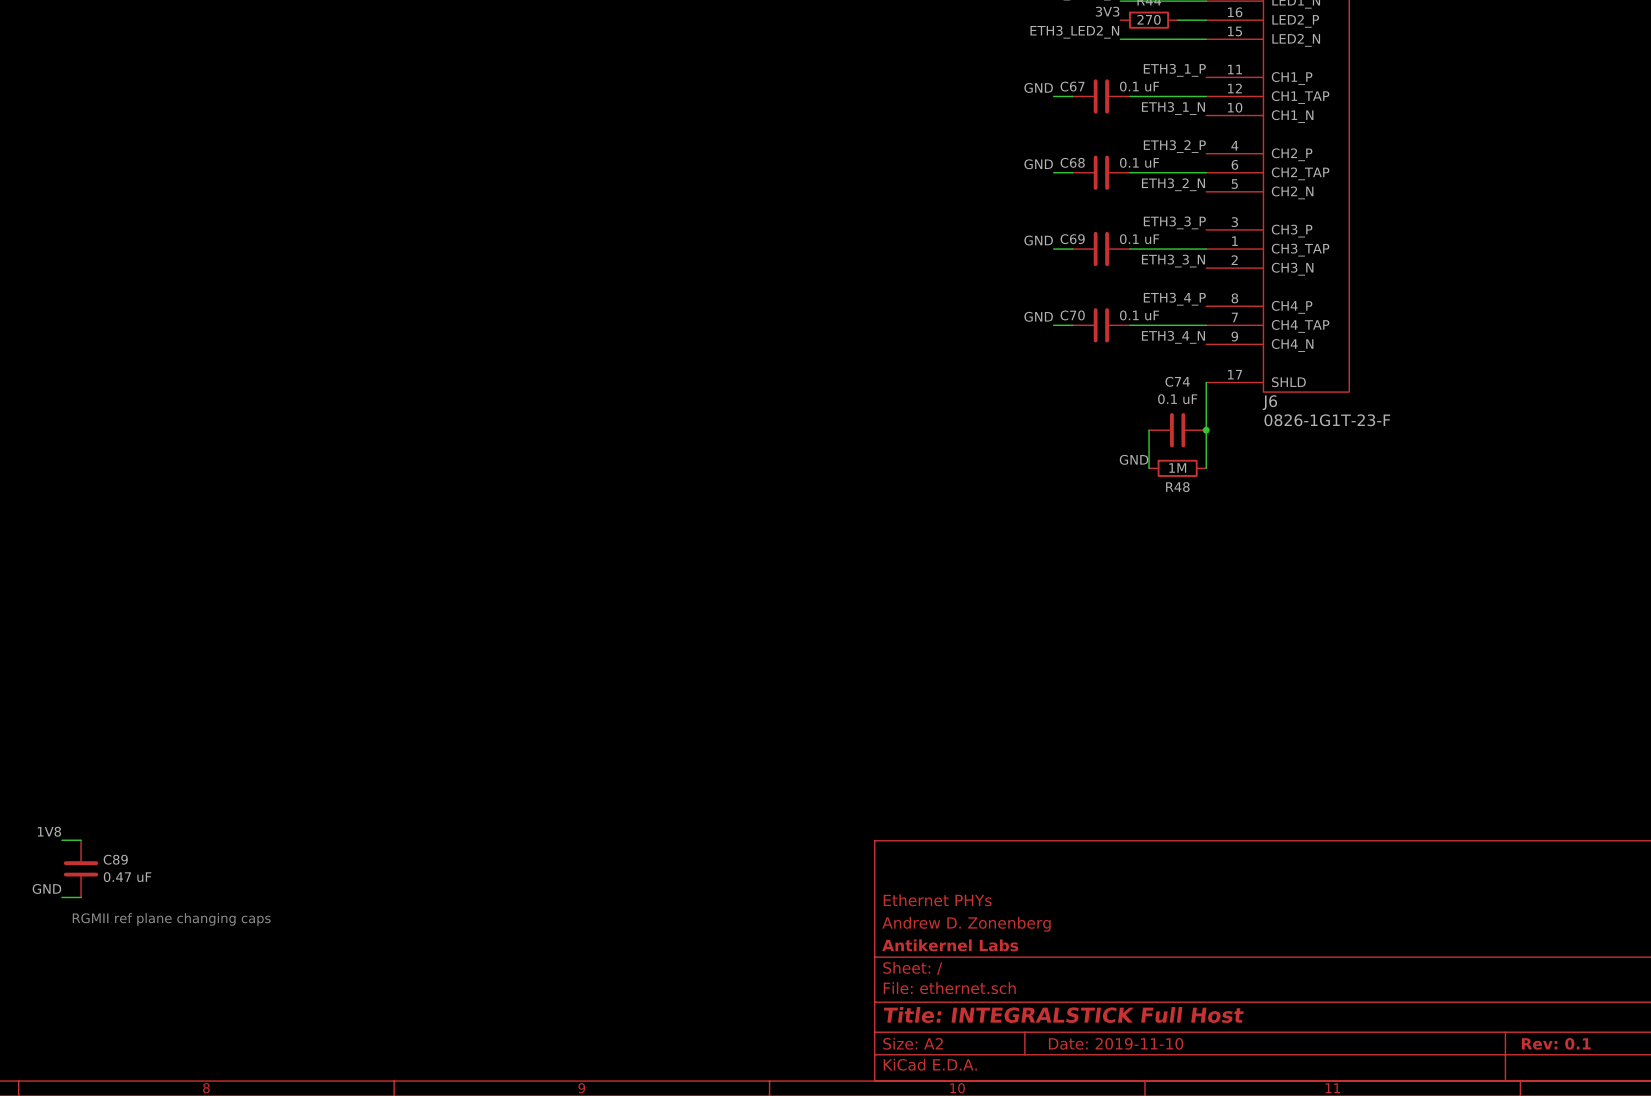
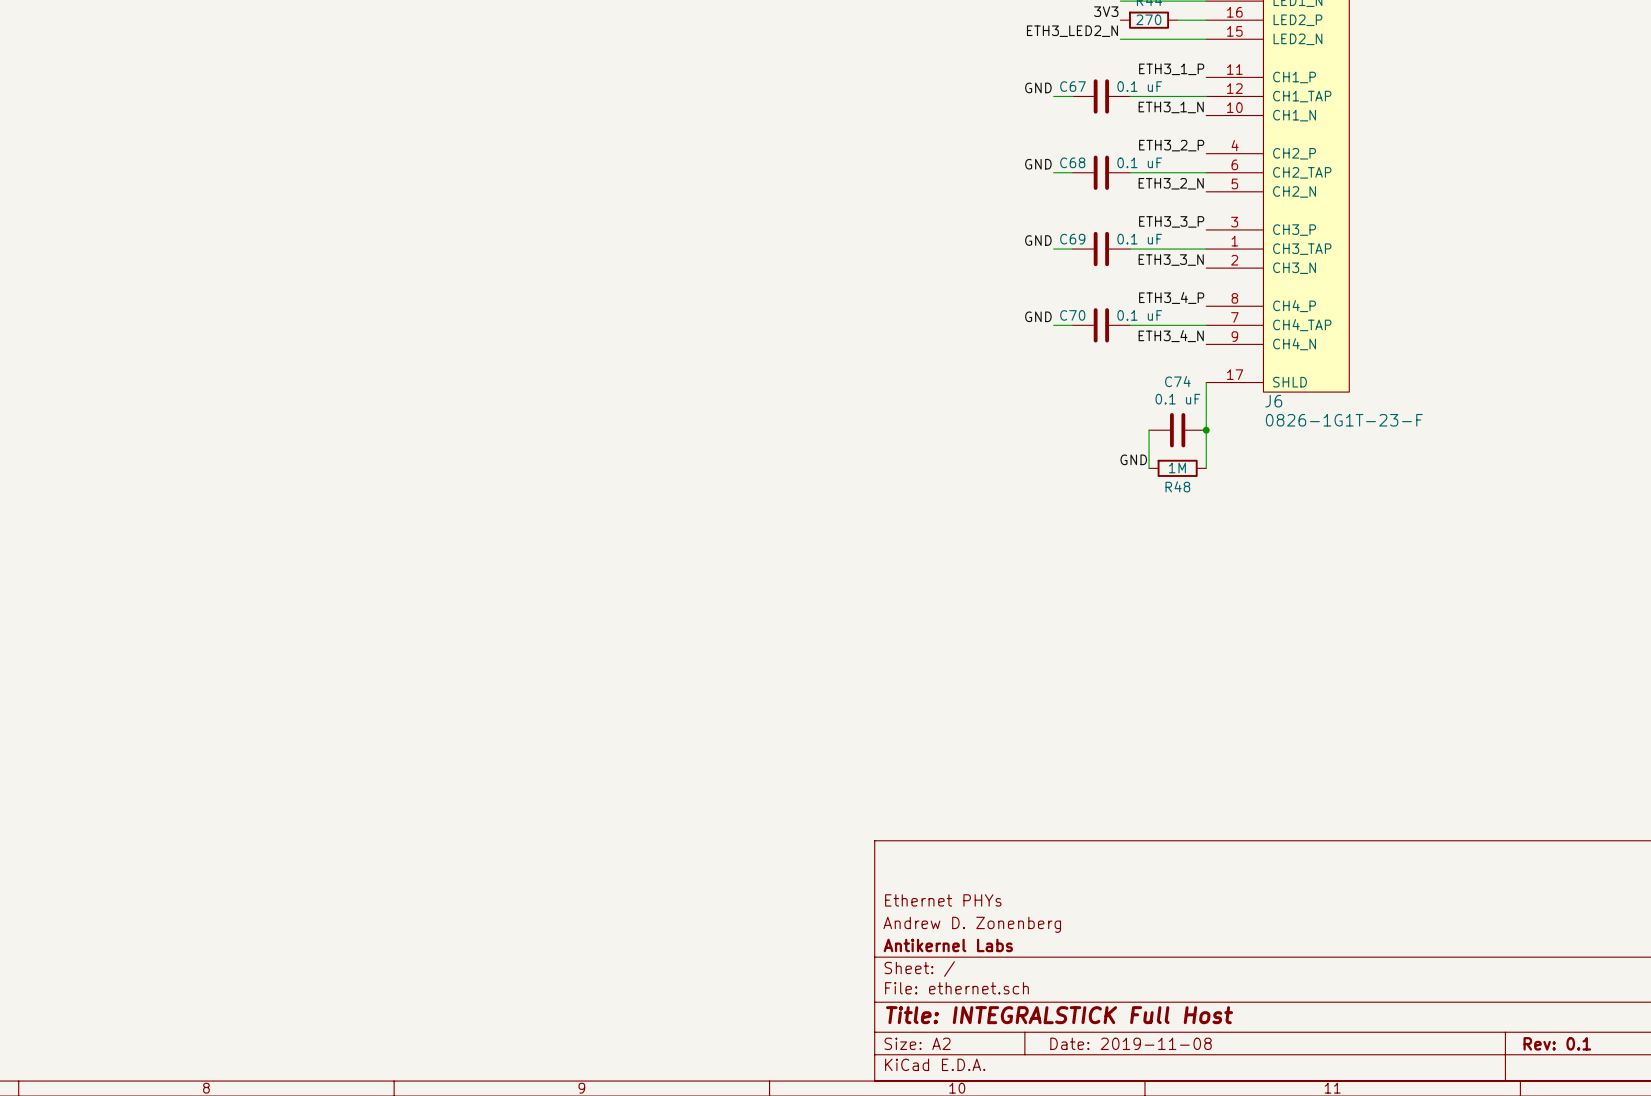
label: 1V8 (49, 831) -> none
wire: (61, 840) (81, 840) -> none
C89: 0.47 uF (81, 868) -> none
label: GND (46, 888) -> none
wire: (61, 897) (81, 897) -> none
text: RGMII ref plane changing caps (171, 919) -> none
title block: Date: 2019-11-10 (1116, 1043) -> Date: 2019-11-08 (1131, 1043)

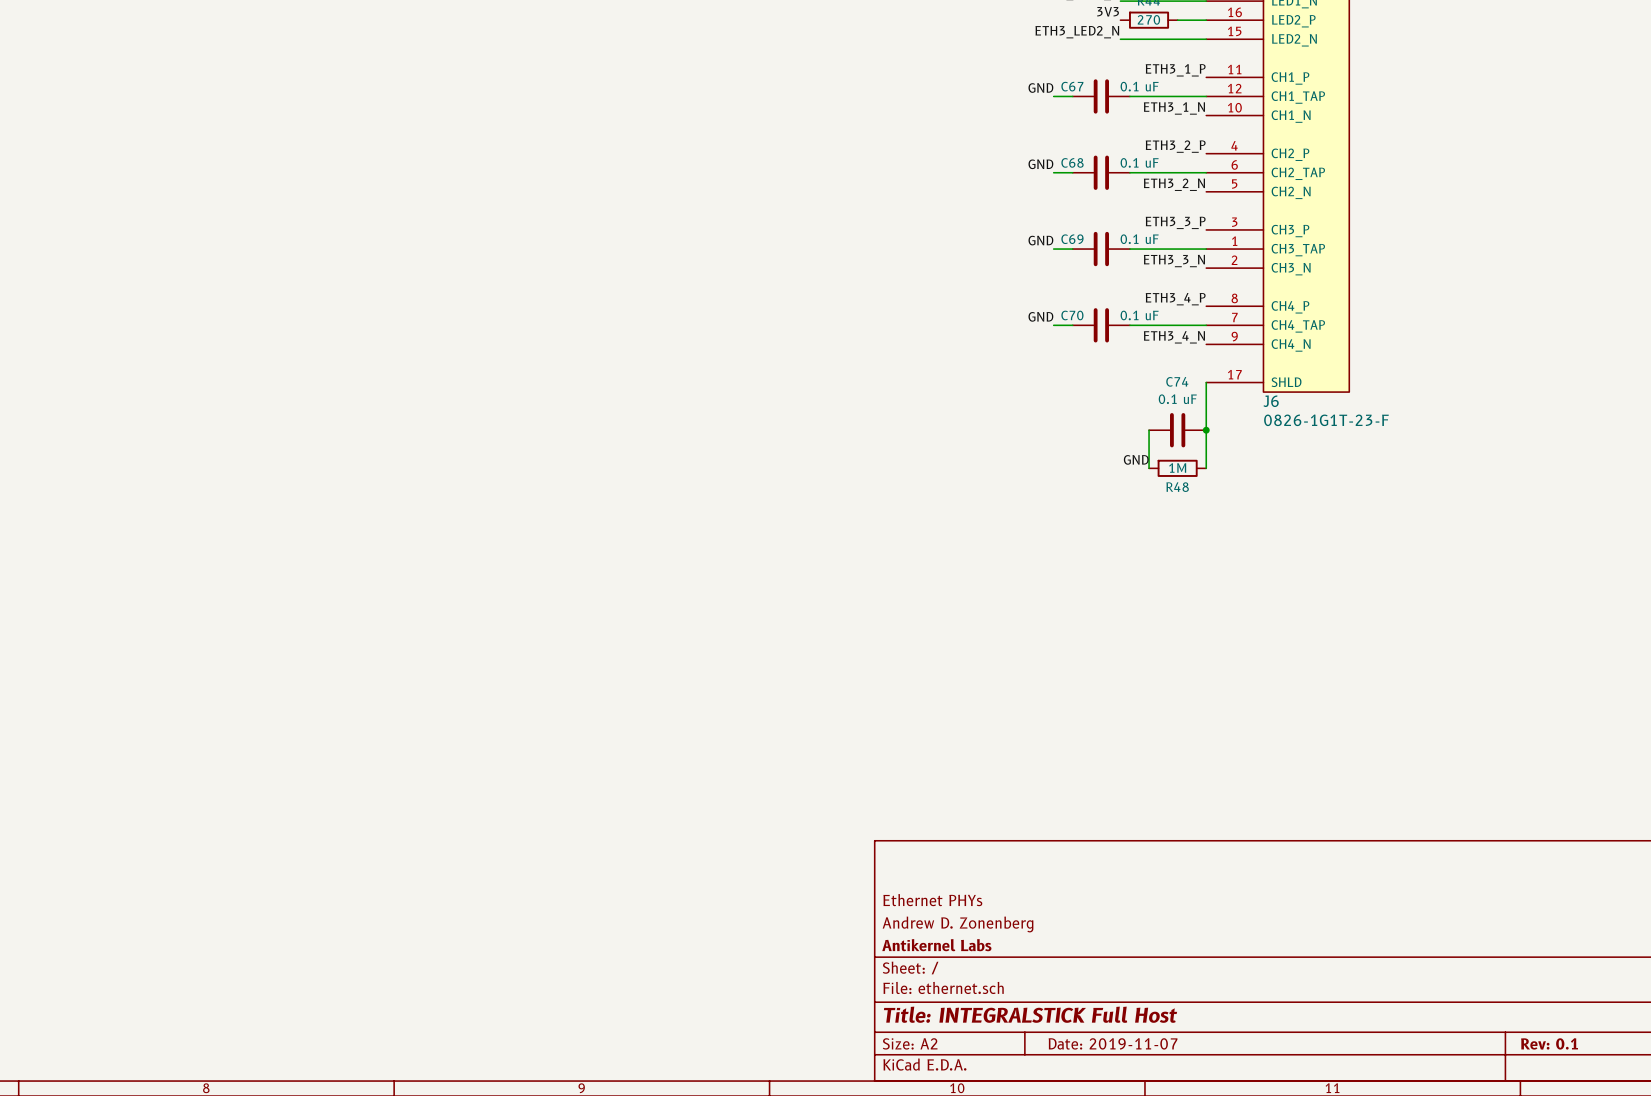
title block: Date: 2019-11-08 (1131, 1043) -> Date: 2019-11-07 (1113, 1043)

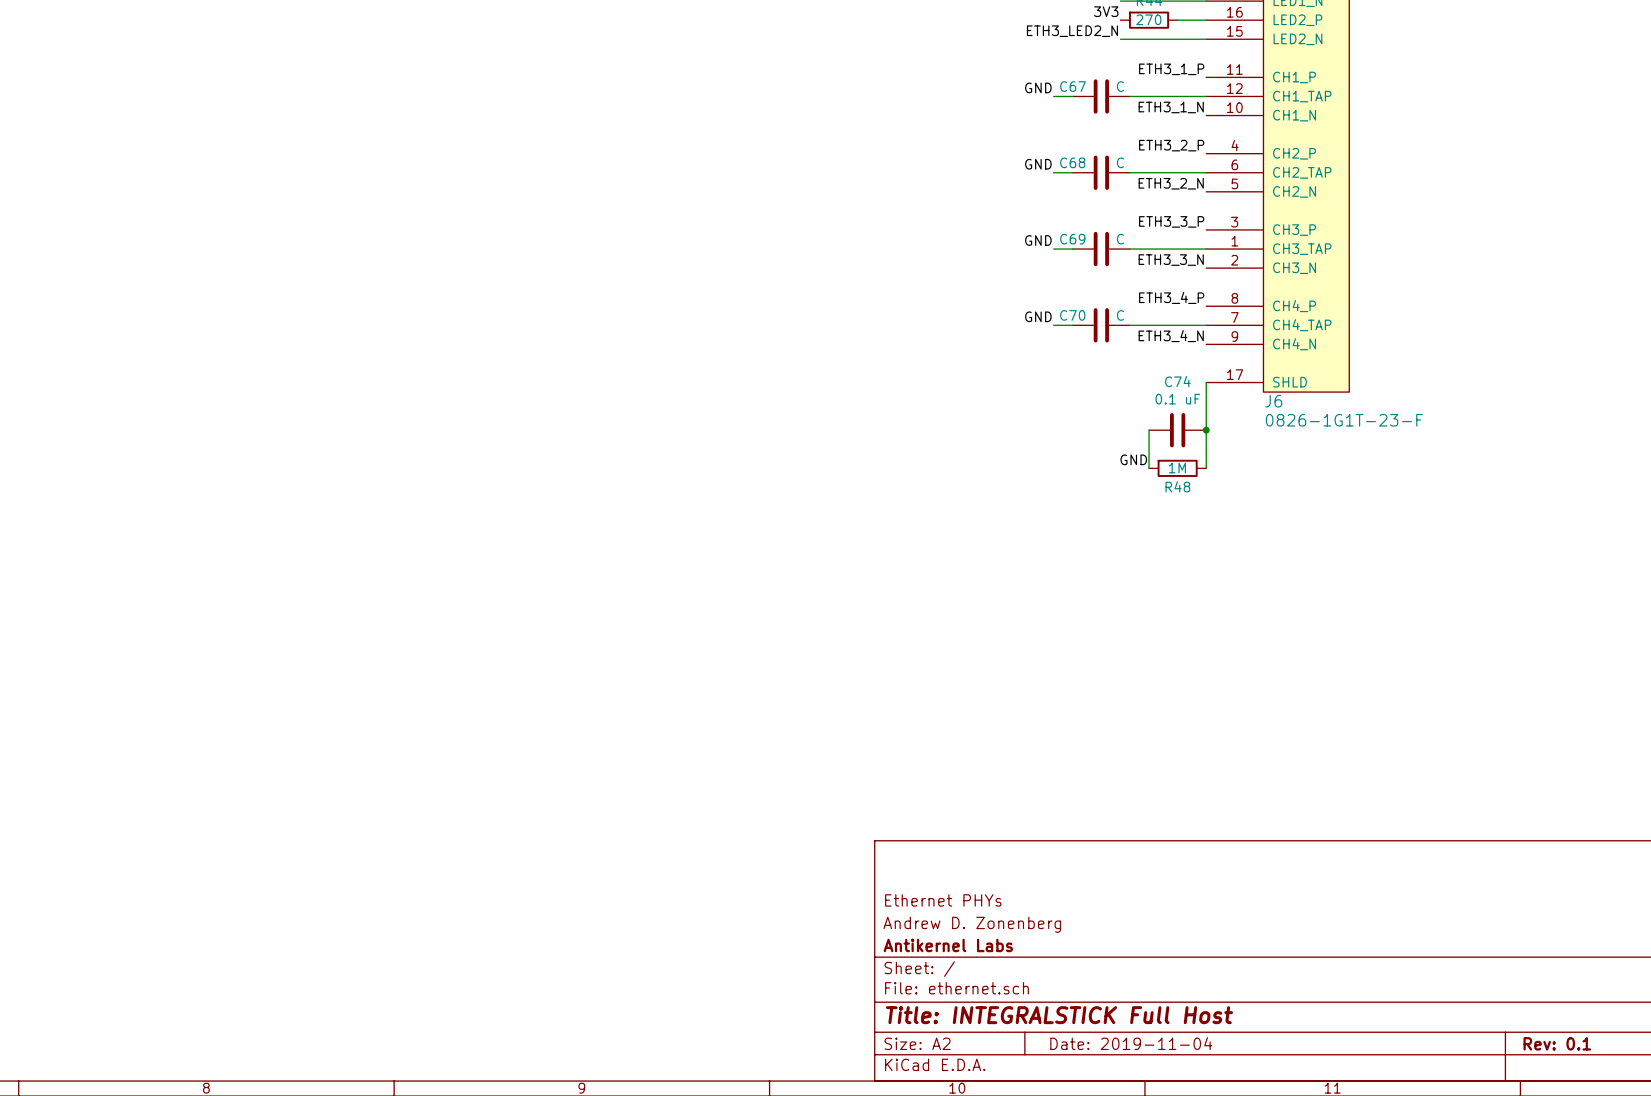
C67 value: 0.1 uF (1139, 86) -> C (1120, 86)
C68 value: 0.1 uF (1139, 162) -> C (1120, 162)
C69 value: 0.1 uF (1139, 239) -> C (1120, 239)
C70 value: 0.1 uF (1139, 315) -> C (1120, 315)
title block: Date: 2019-11-07 (1113, 1043) -> Date: 2019-11-04 (1131, 1043)

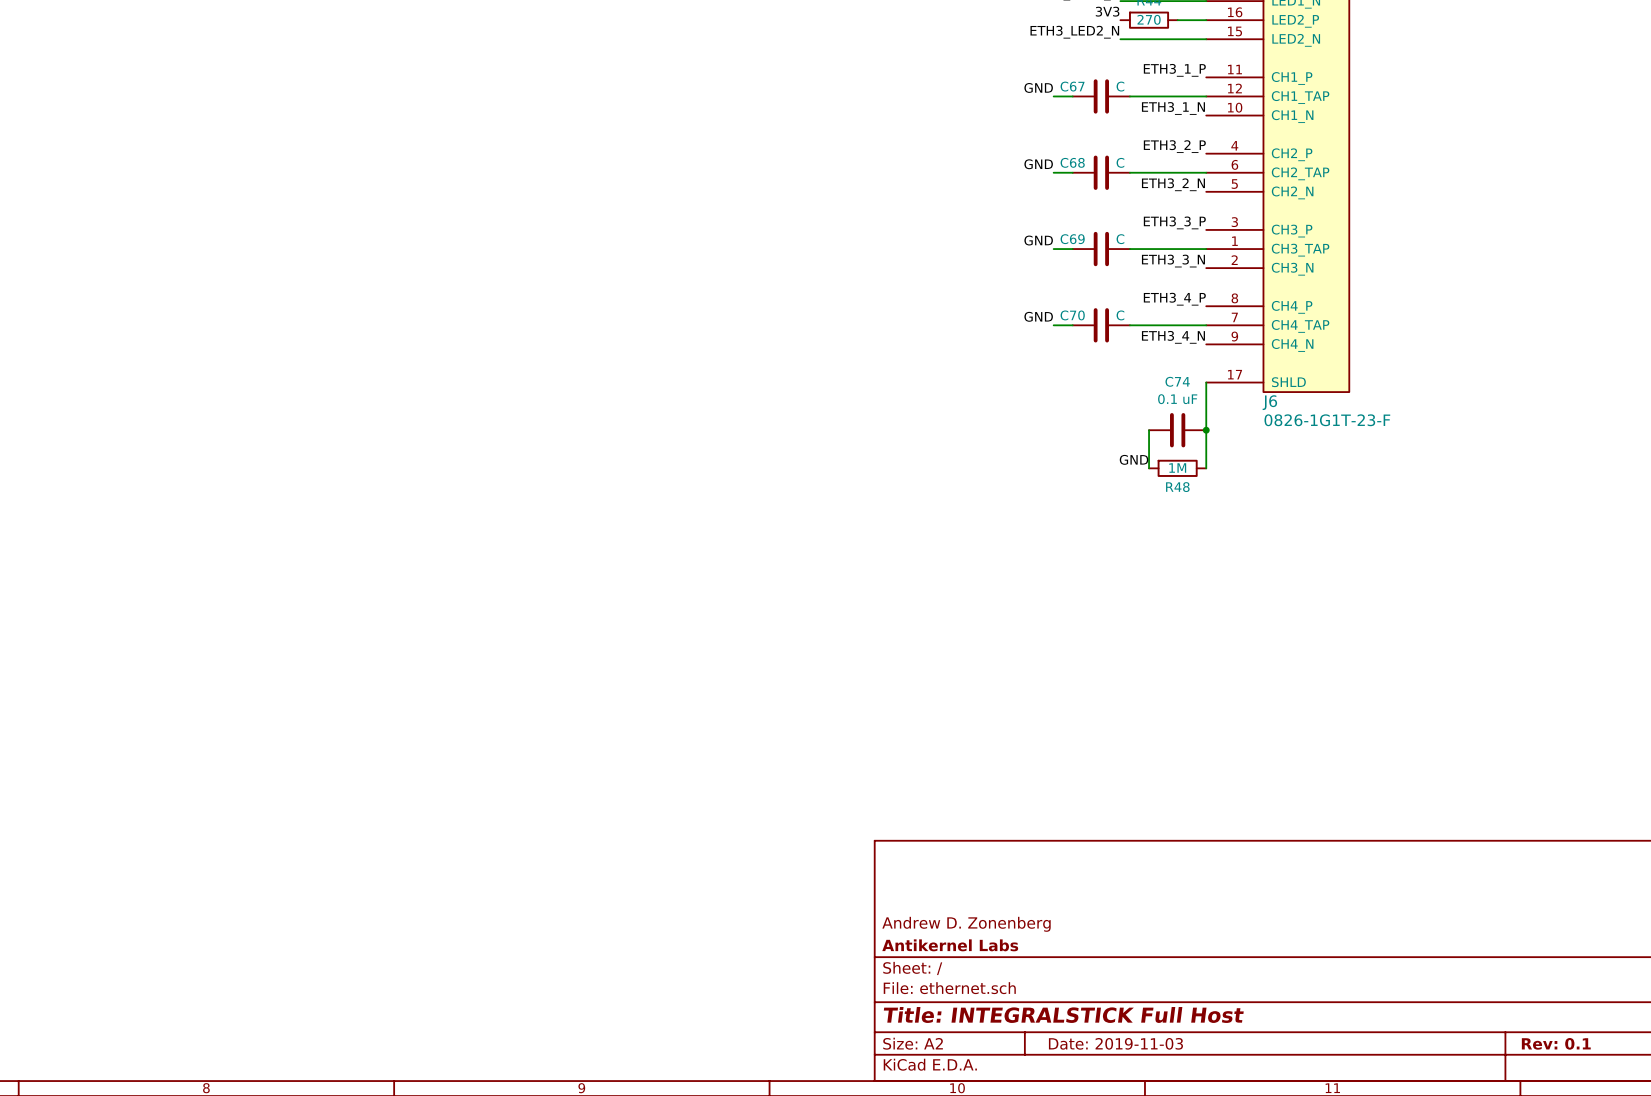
title block: Ethernet PHYs (943, 900) -> none
title block: Date: 2019-11-04 (1131, 1043) -> Date: 2019-11-03 (1115, 1043)

